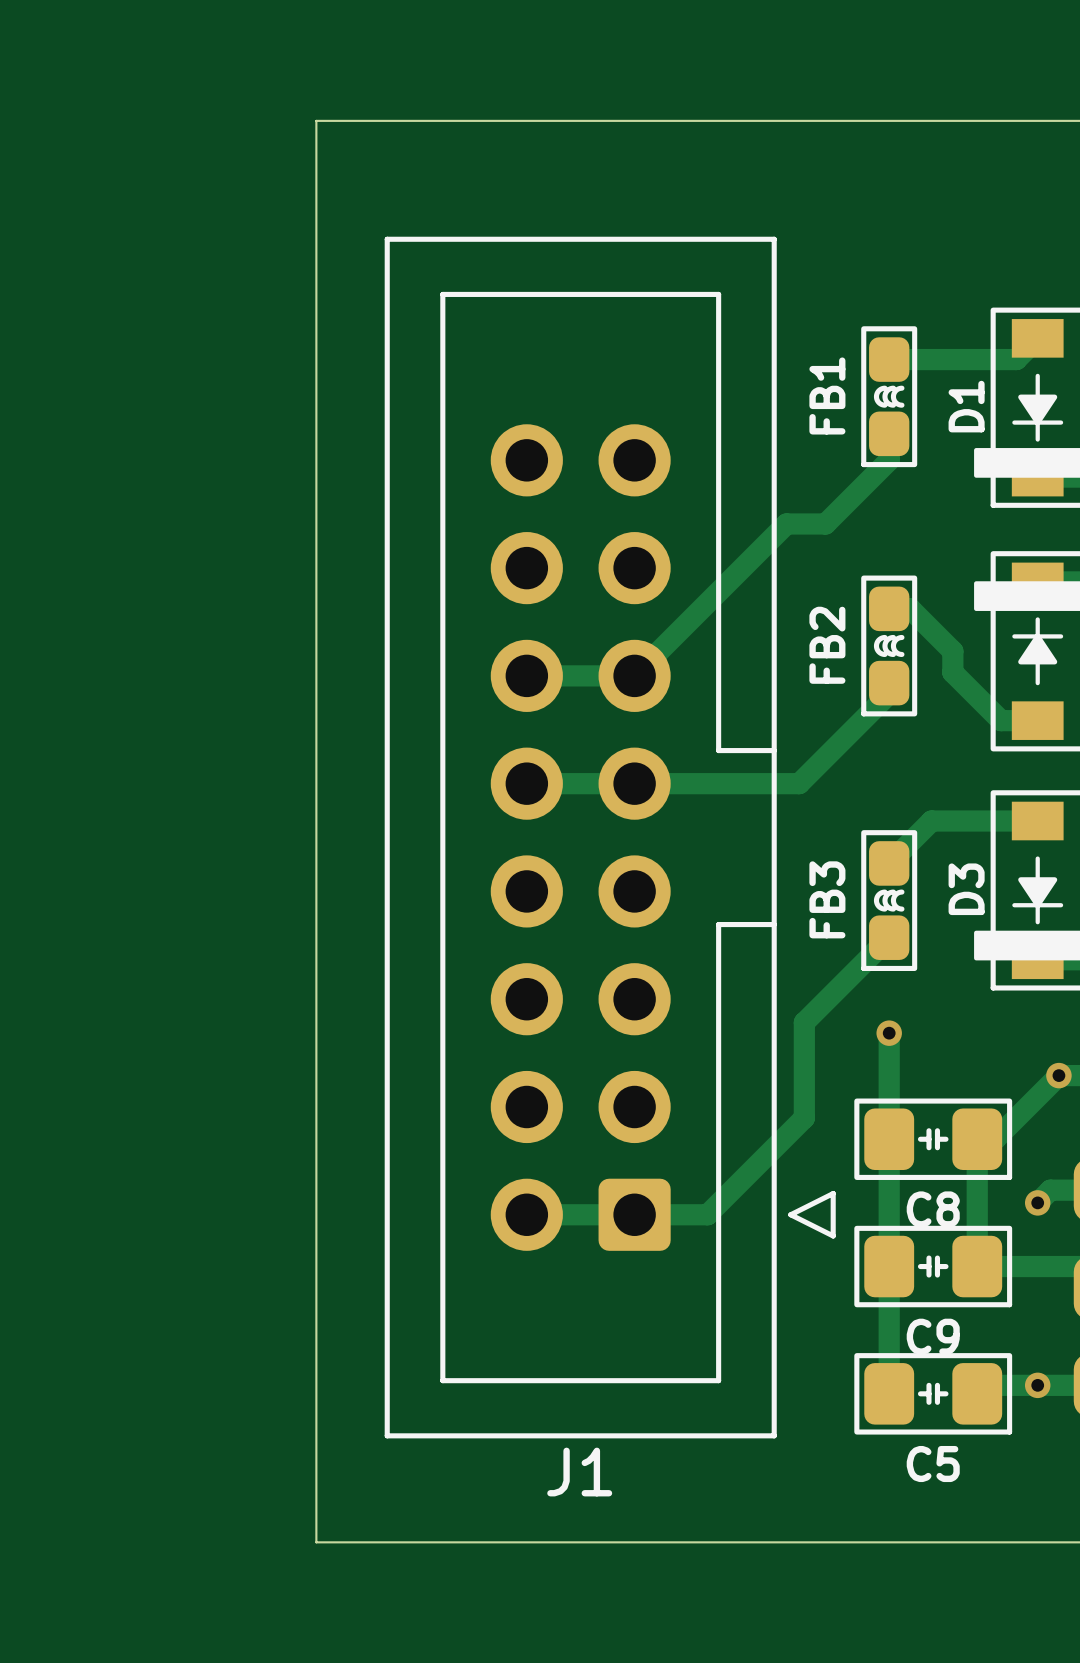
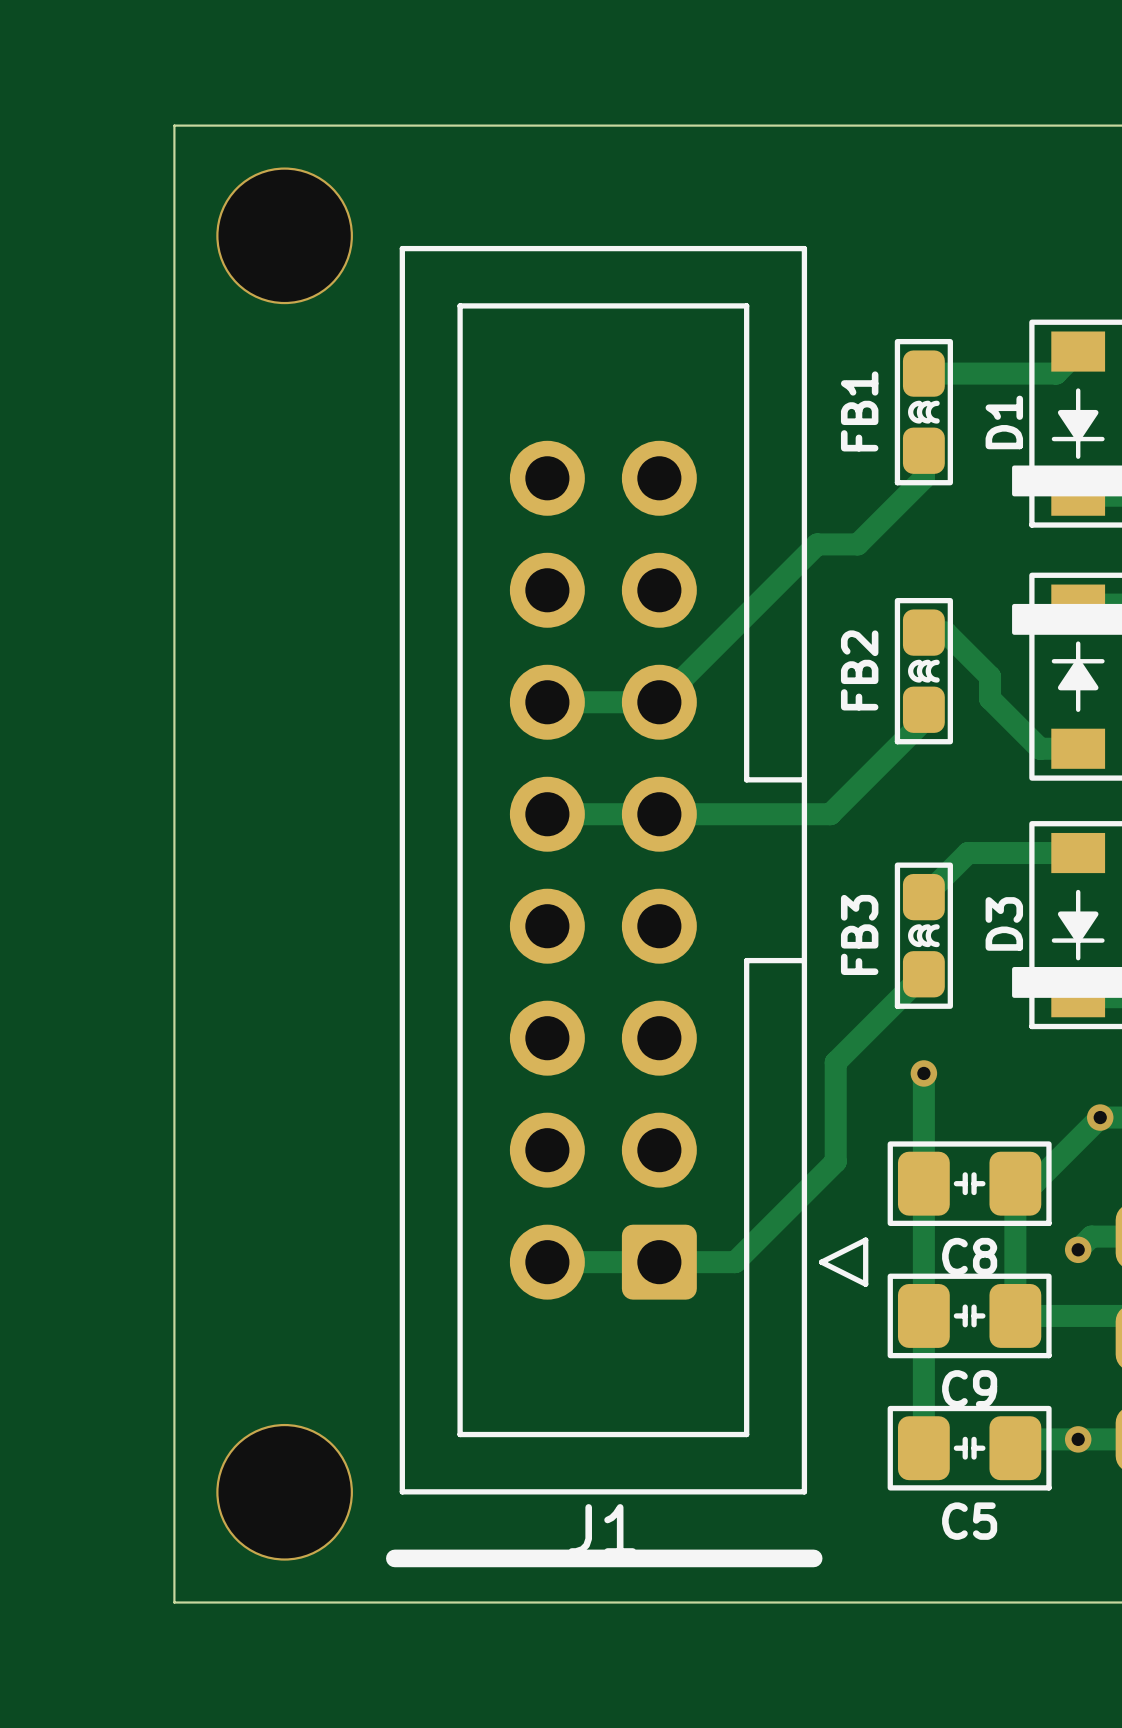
board edge: (316, 120) (316, 1542) -> (328, 125) (174, 125) (174, 1602) (328, 1602)
via: none -> (284, 235)
via: none -> (284, 1492)
line: none -> (394, 1558) (813, 1558)

